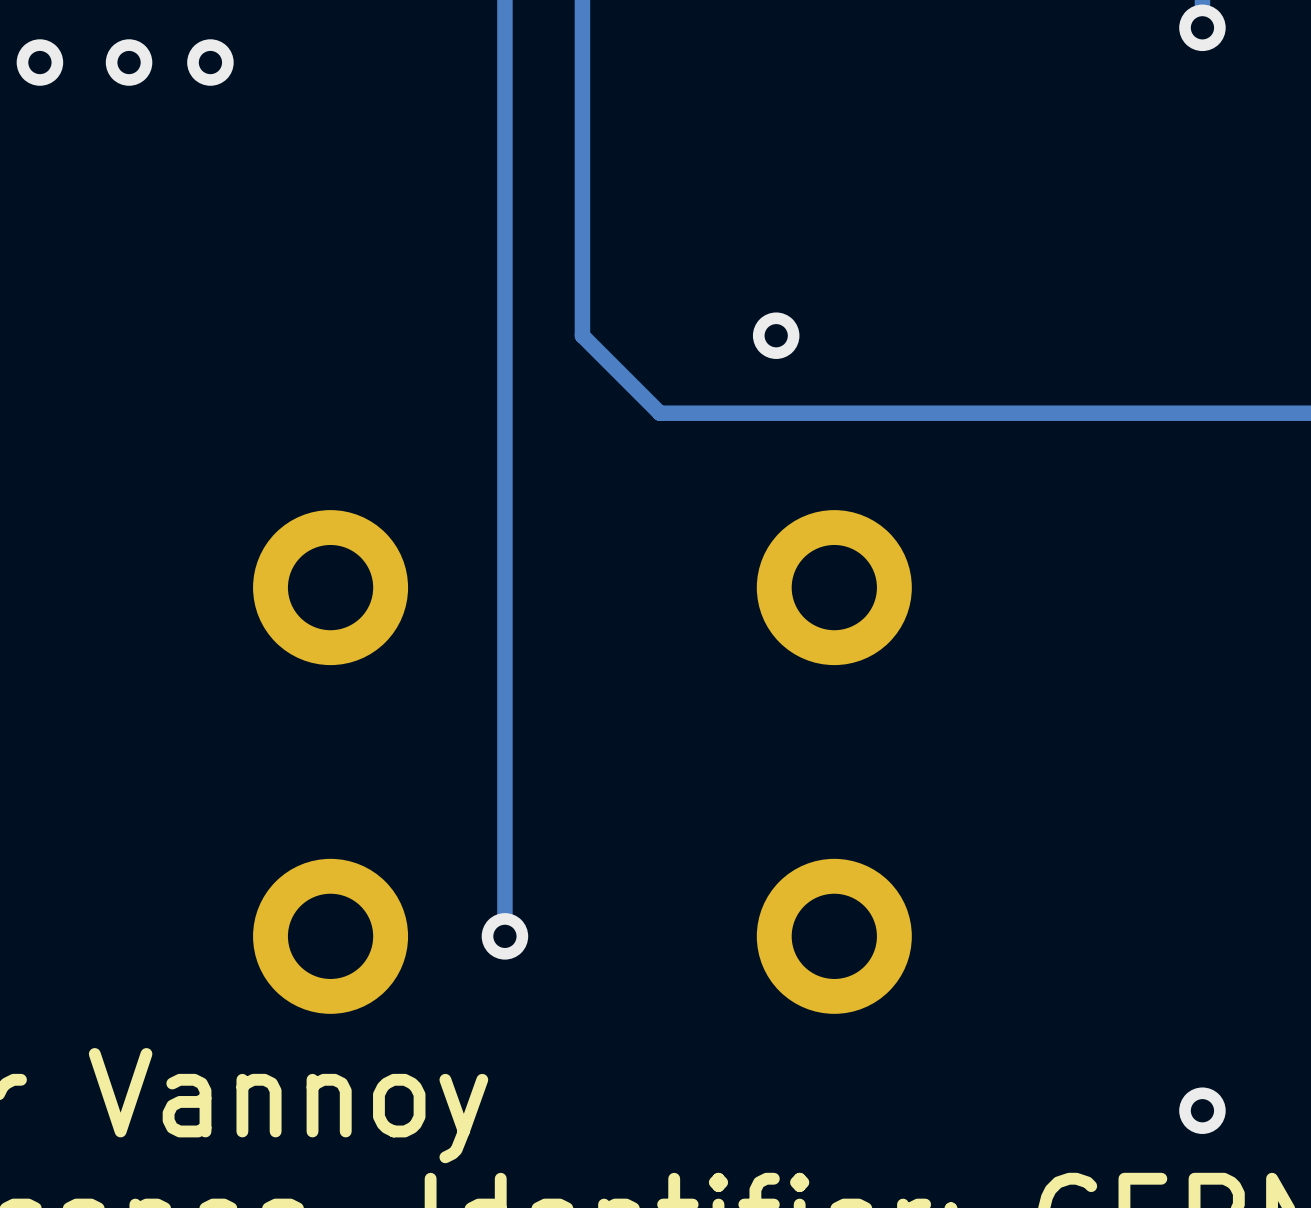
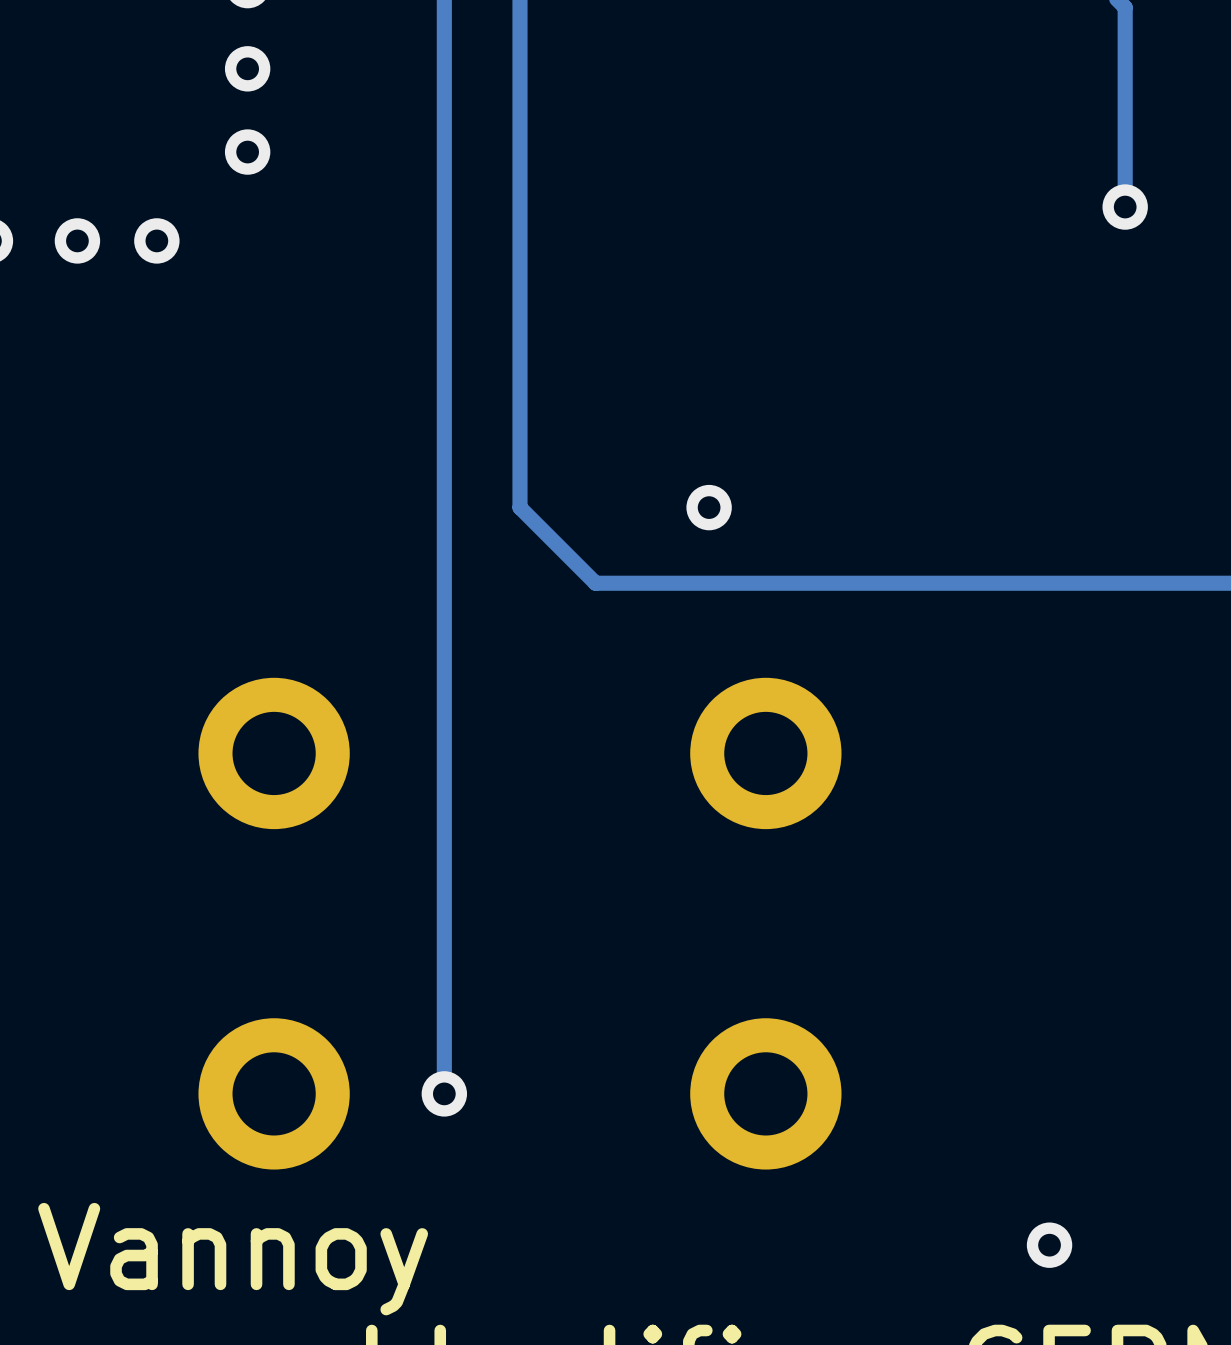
via position: (1202, 1110) -> (1049, 1245)

